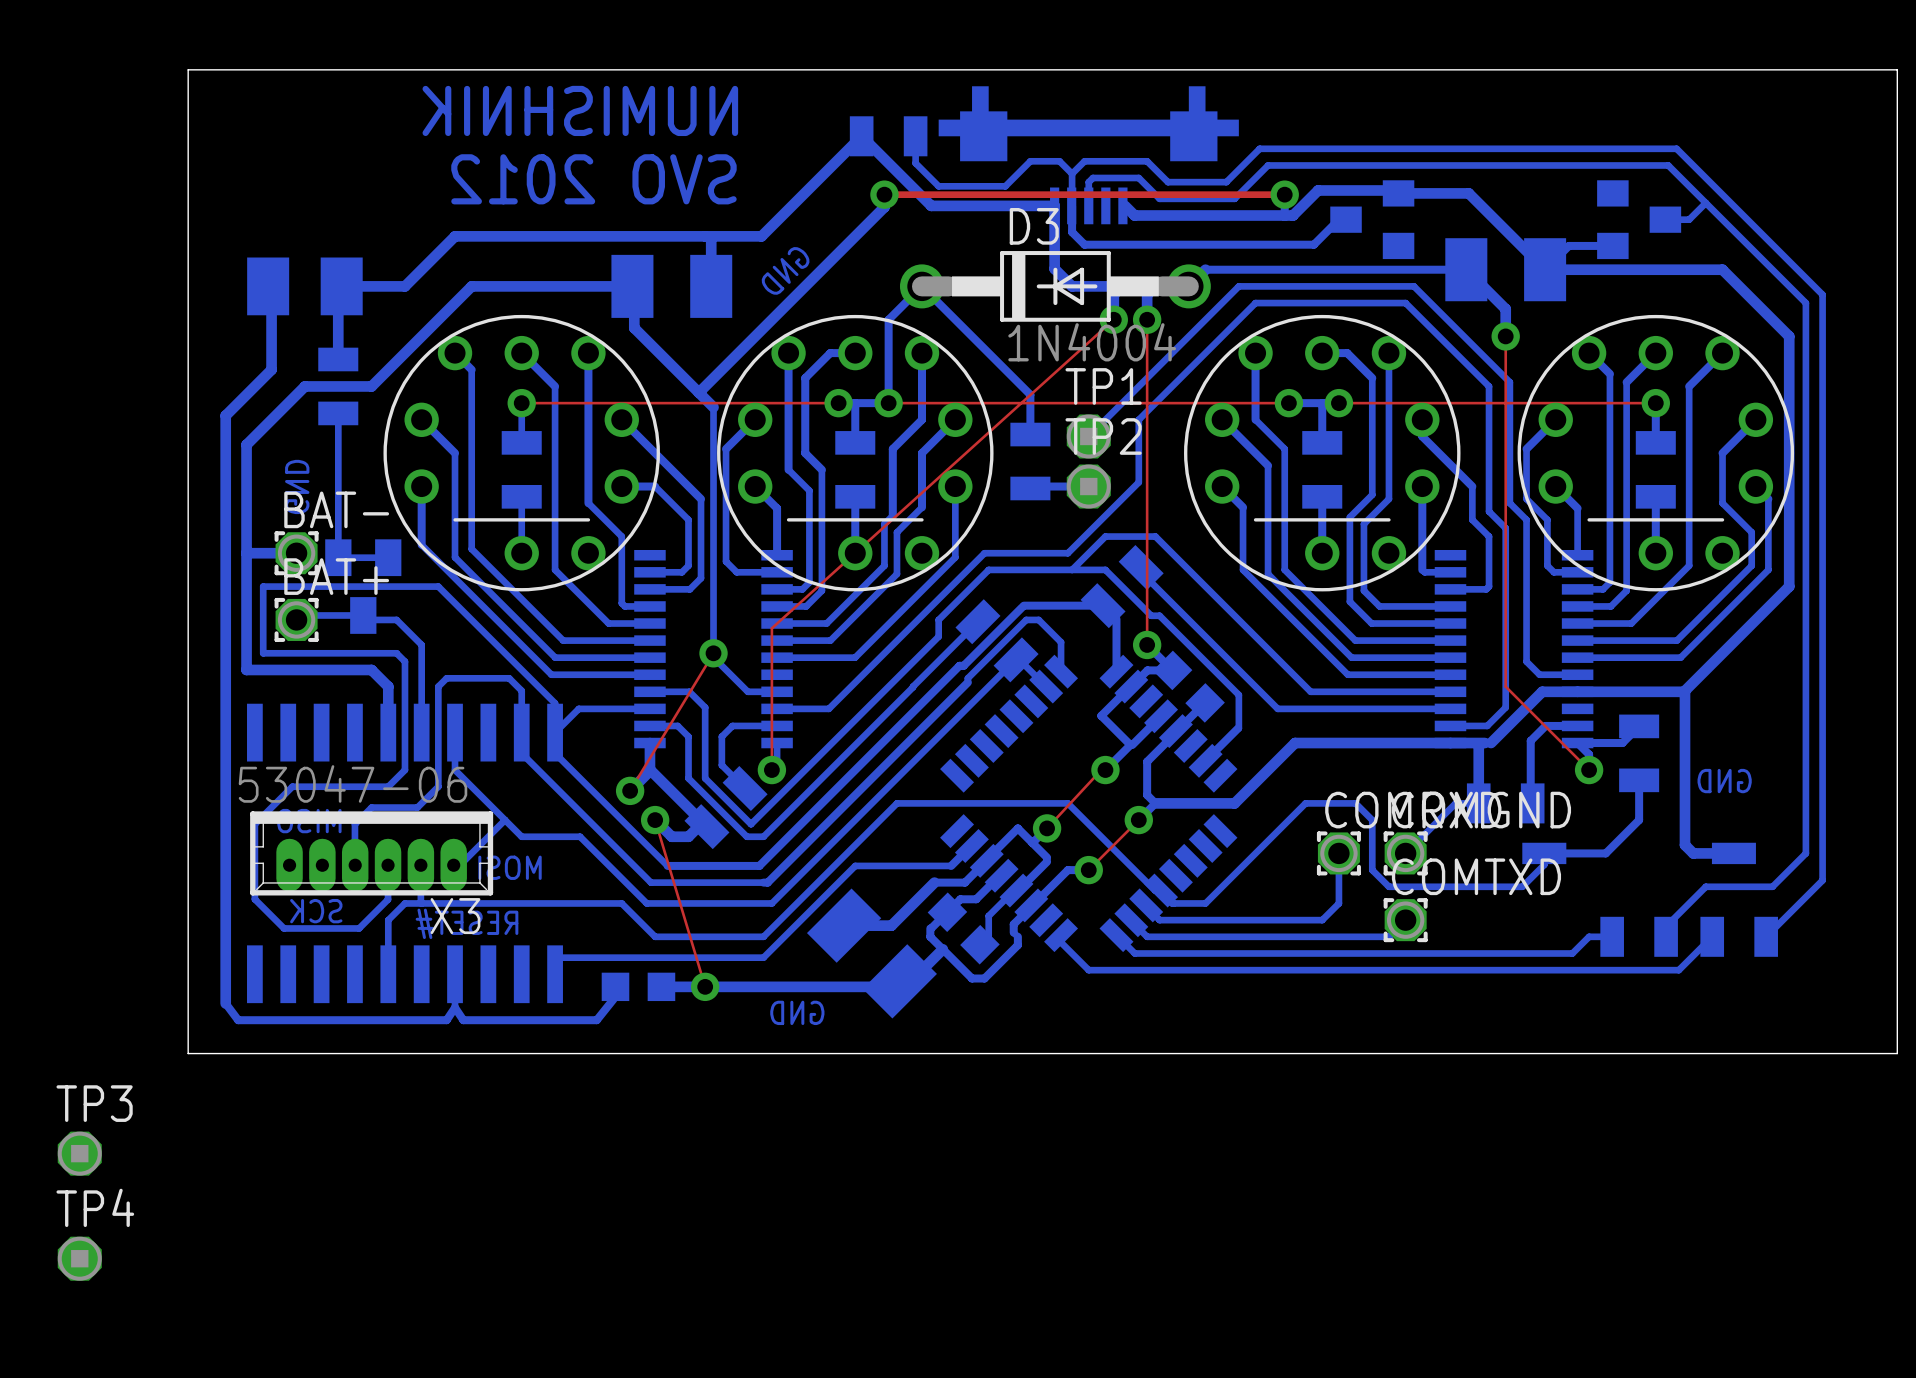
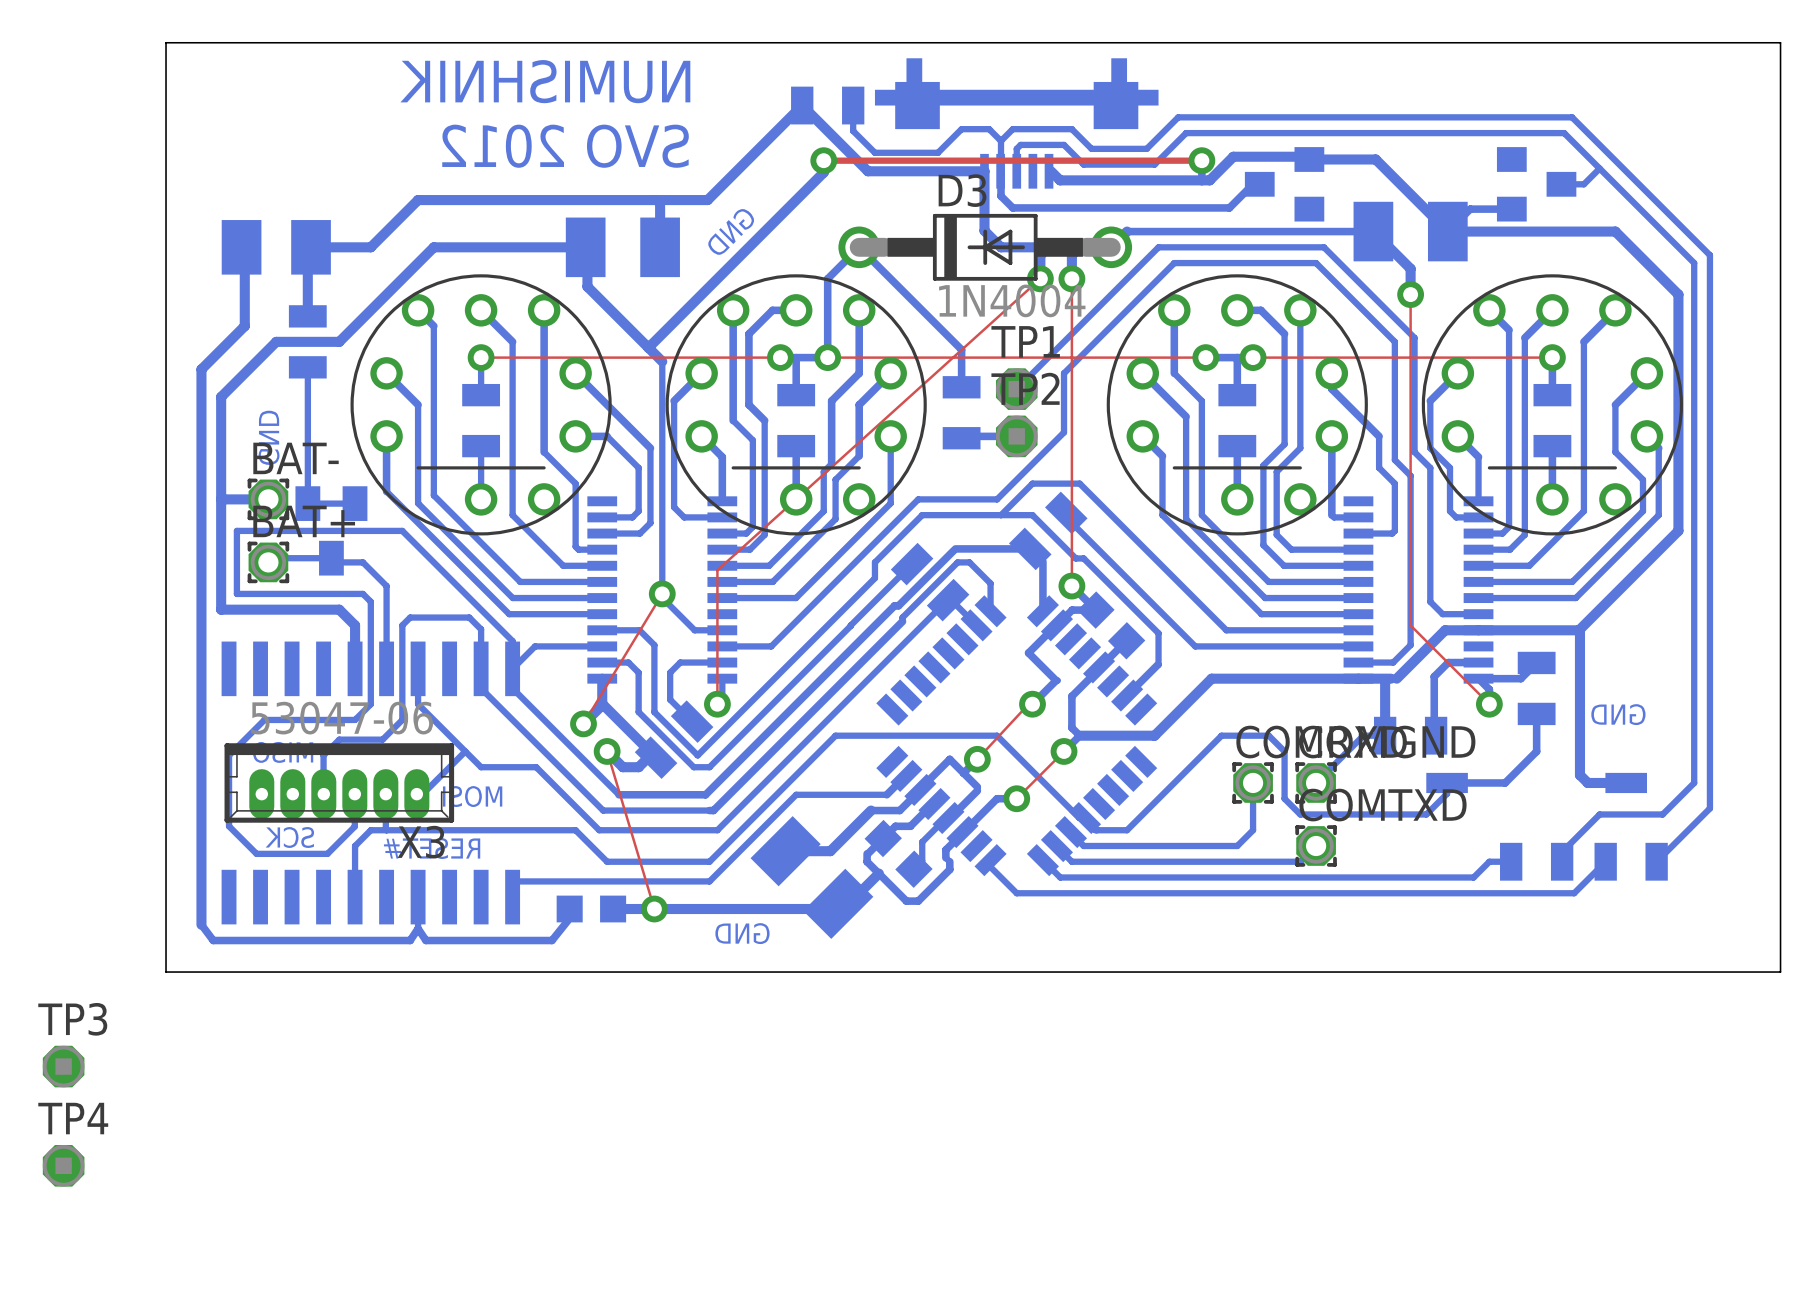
bottom track: (1161, 716) (1132, 745) -> none

